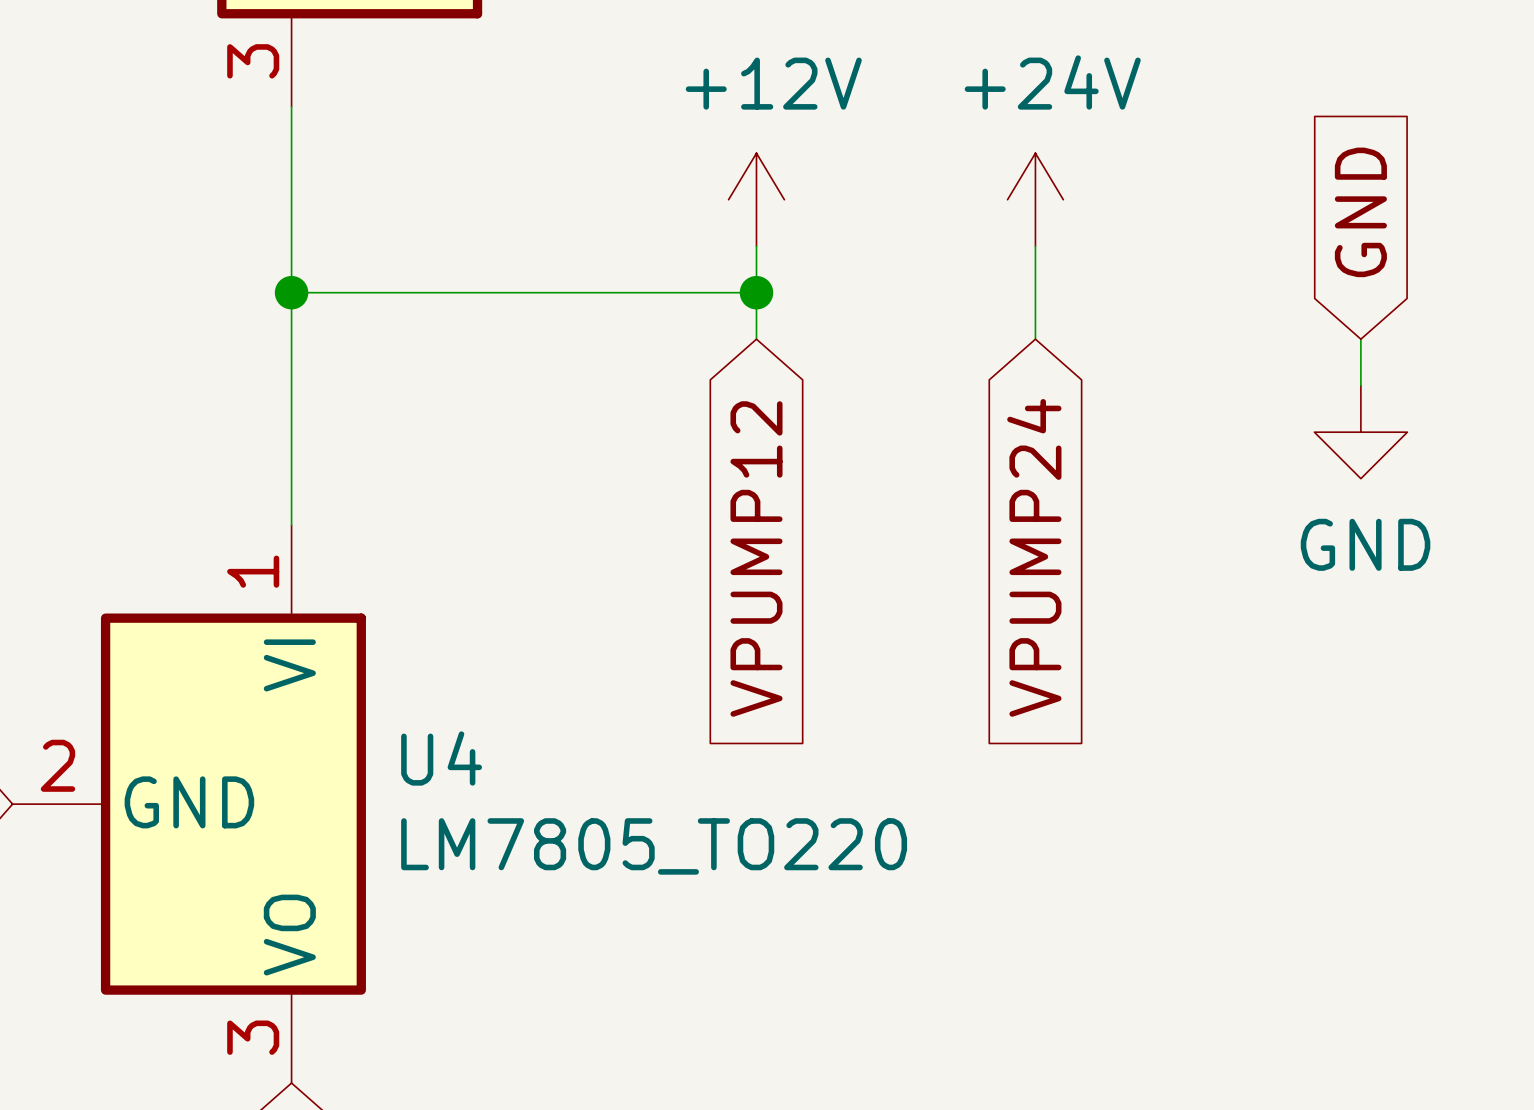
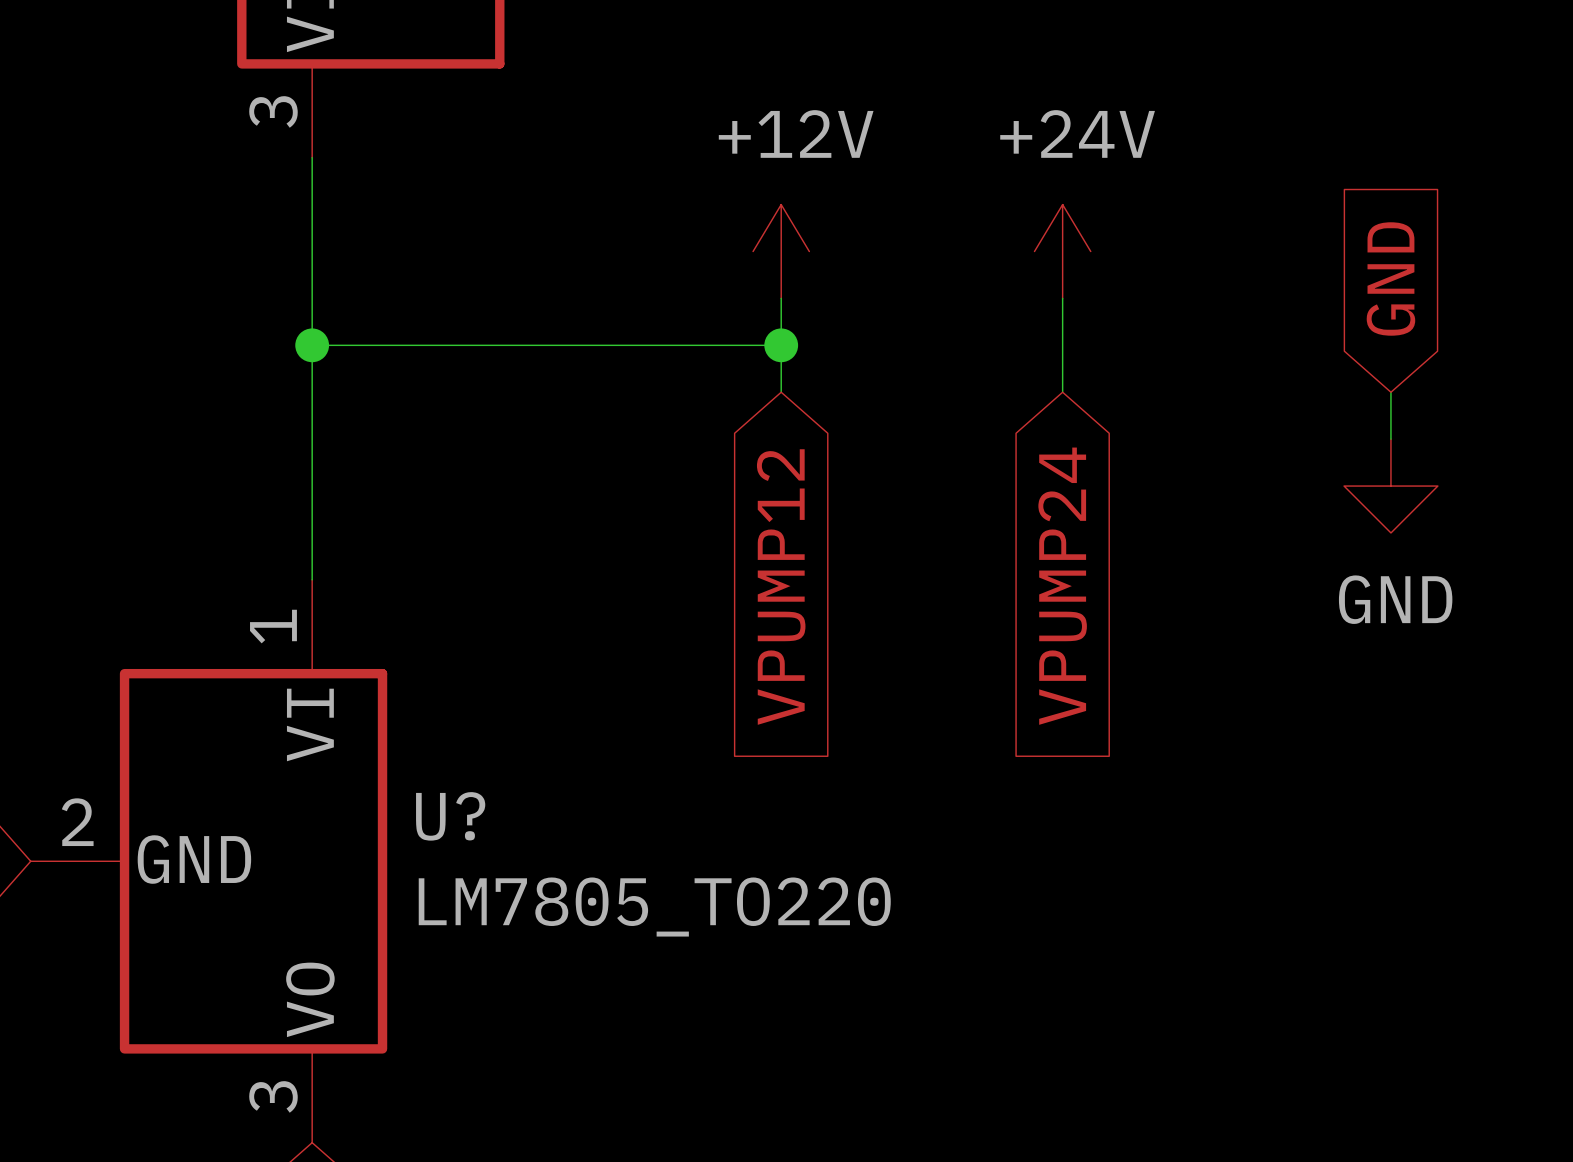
U4 name: U4 (441, 758) -> U? (450, 816)

